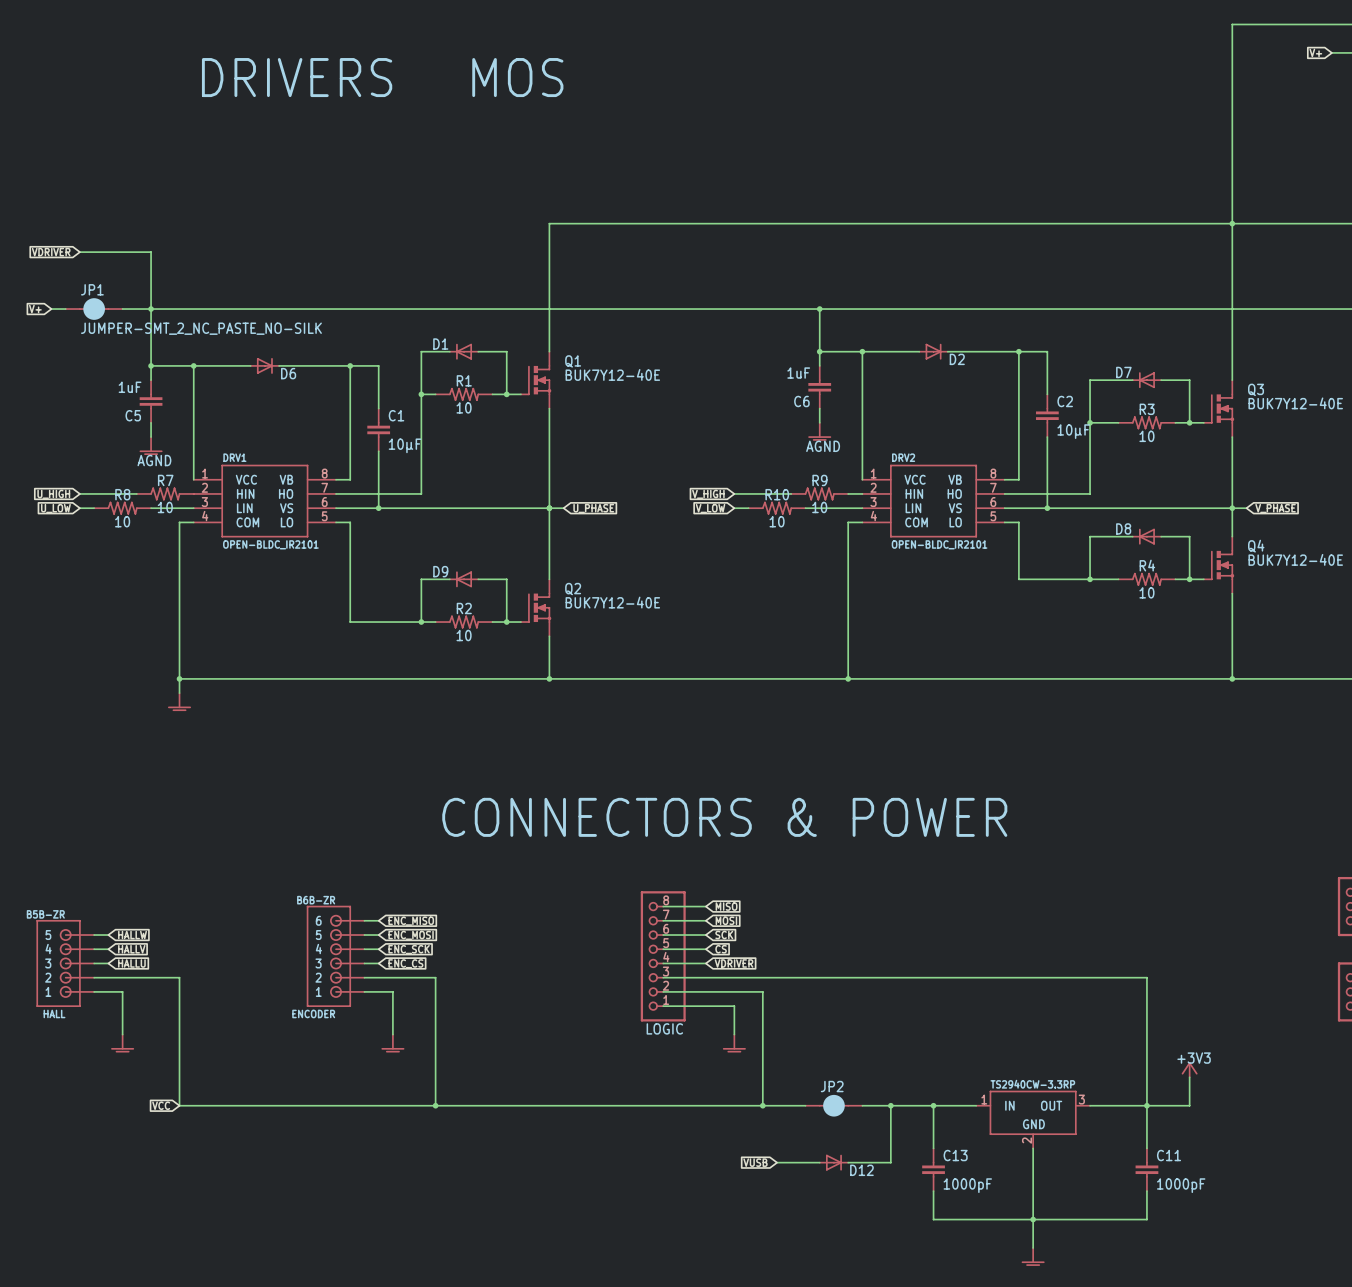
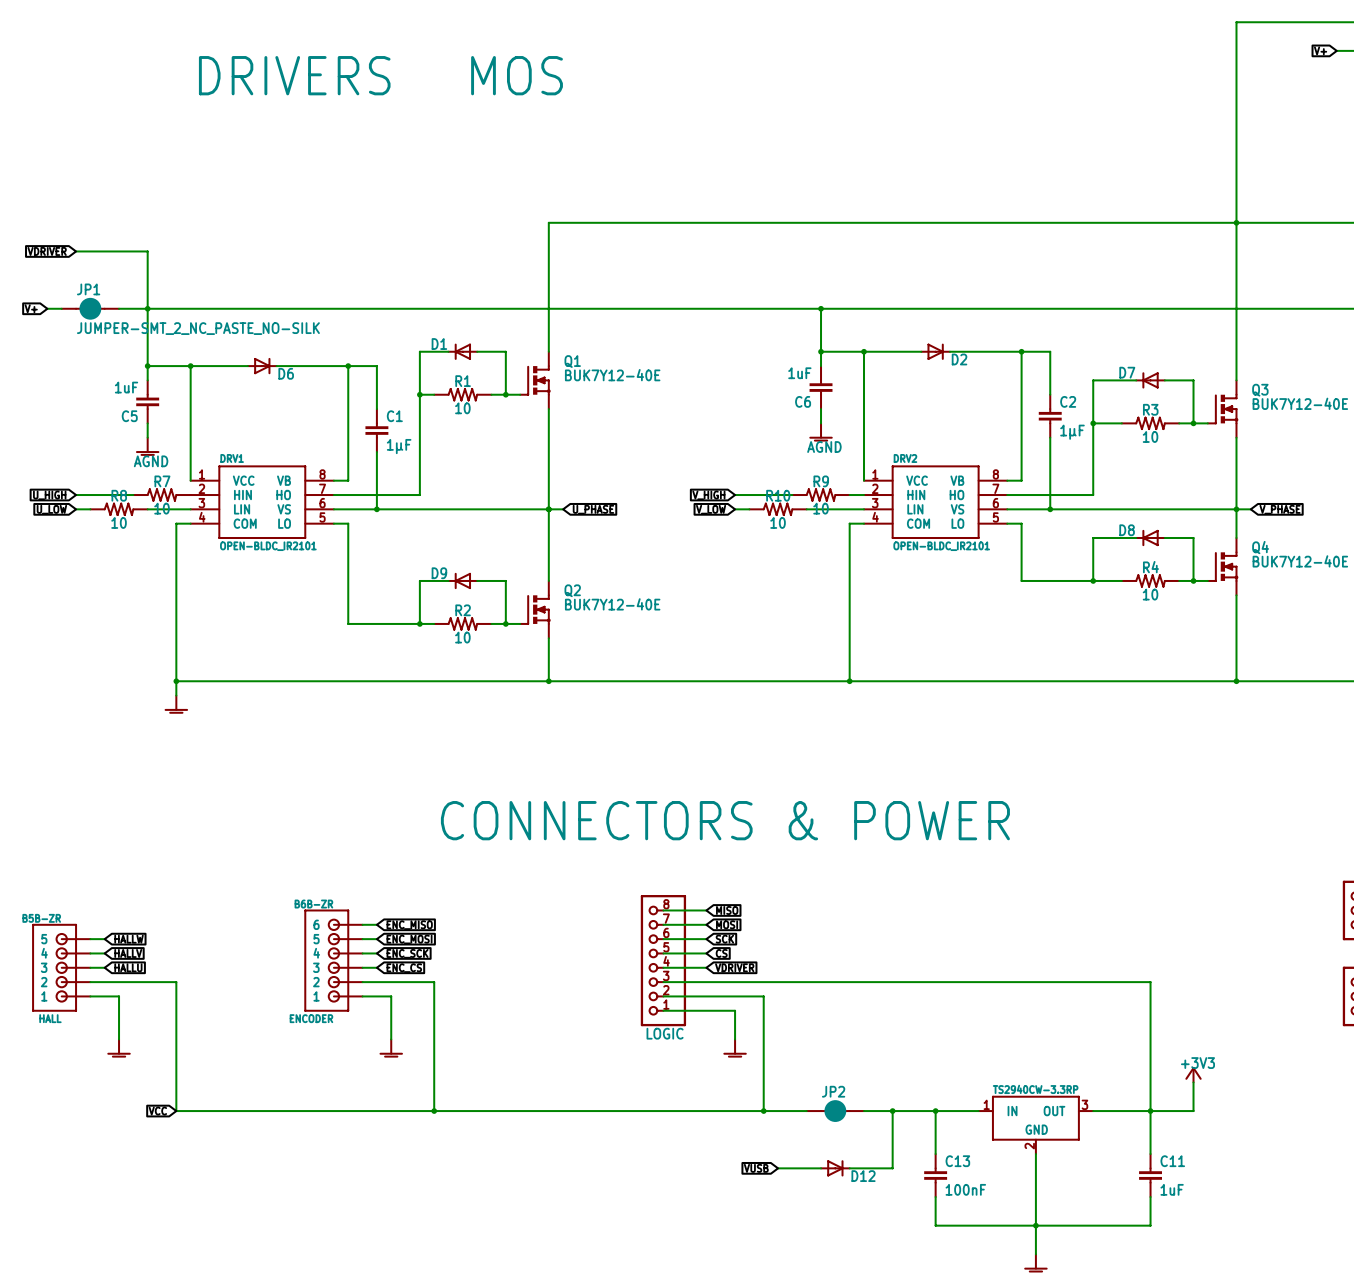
C2 value: 10µF (1073, 431) -> 1µF (1072, 432)
C1 value: 10µF (405, 445) -> 1µF (399, 446)
C13 value: 1000pF (967, 1185) -> 100nF (965, 1189)
C11 value: 1000pF (1181, 1185) -> 1uF (1172, 1189)

